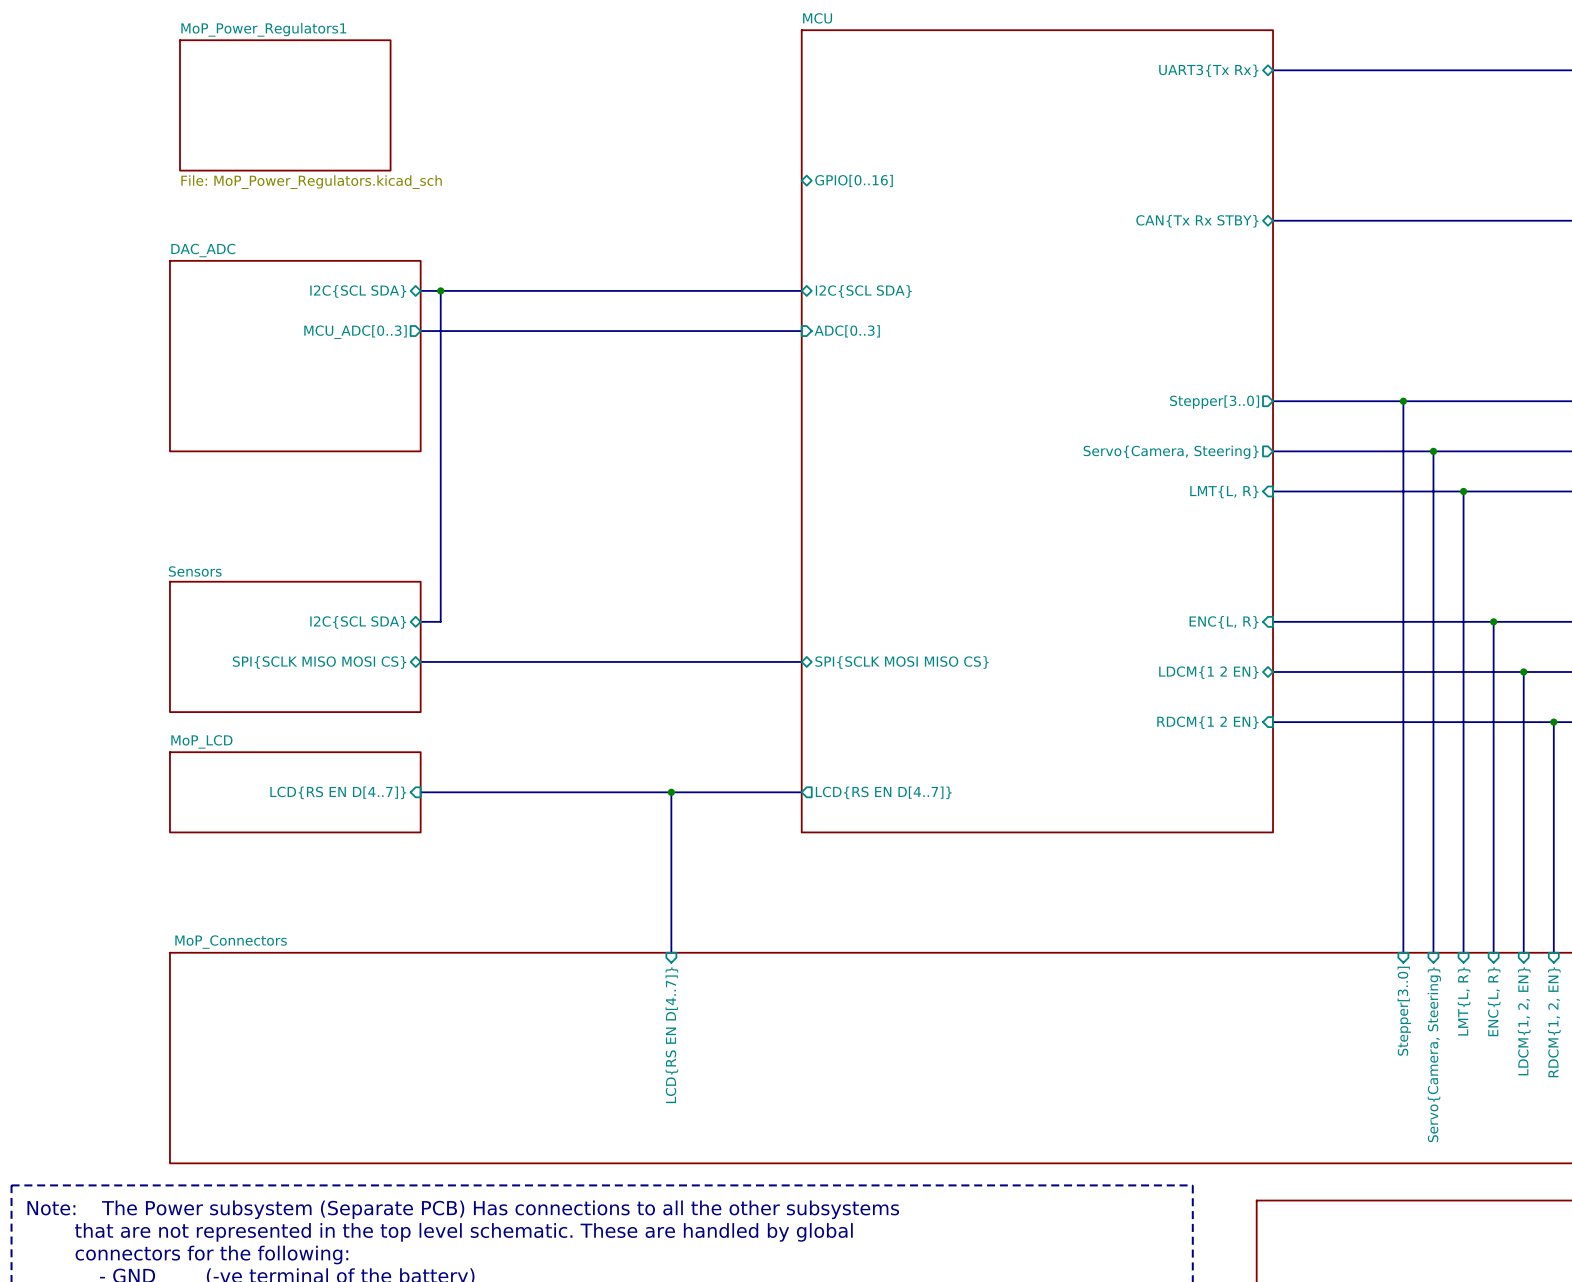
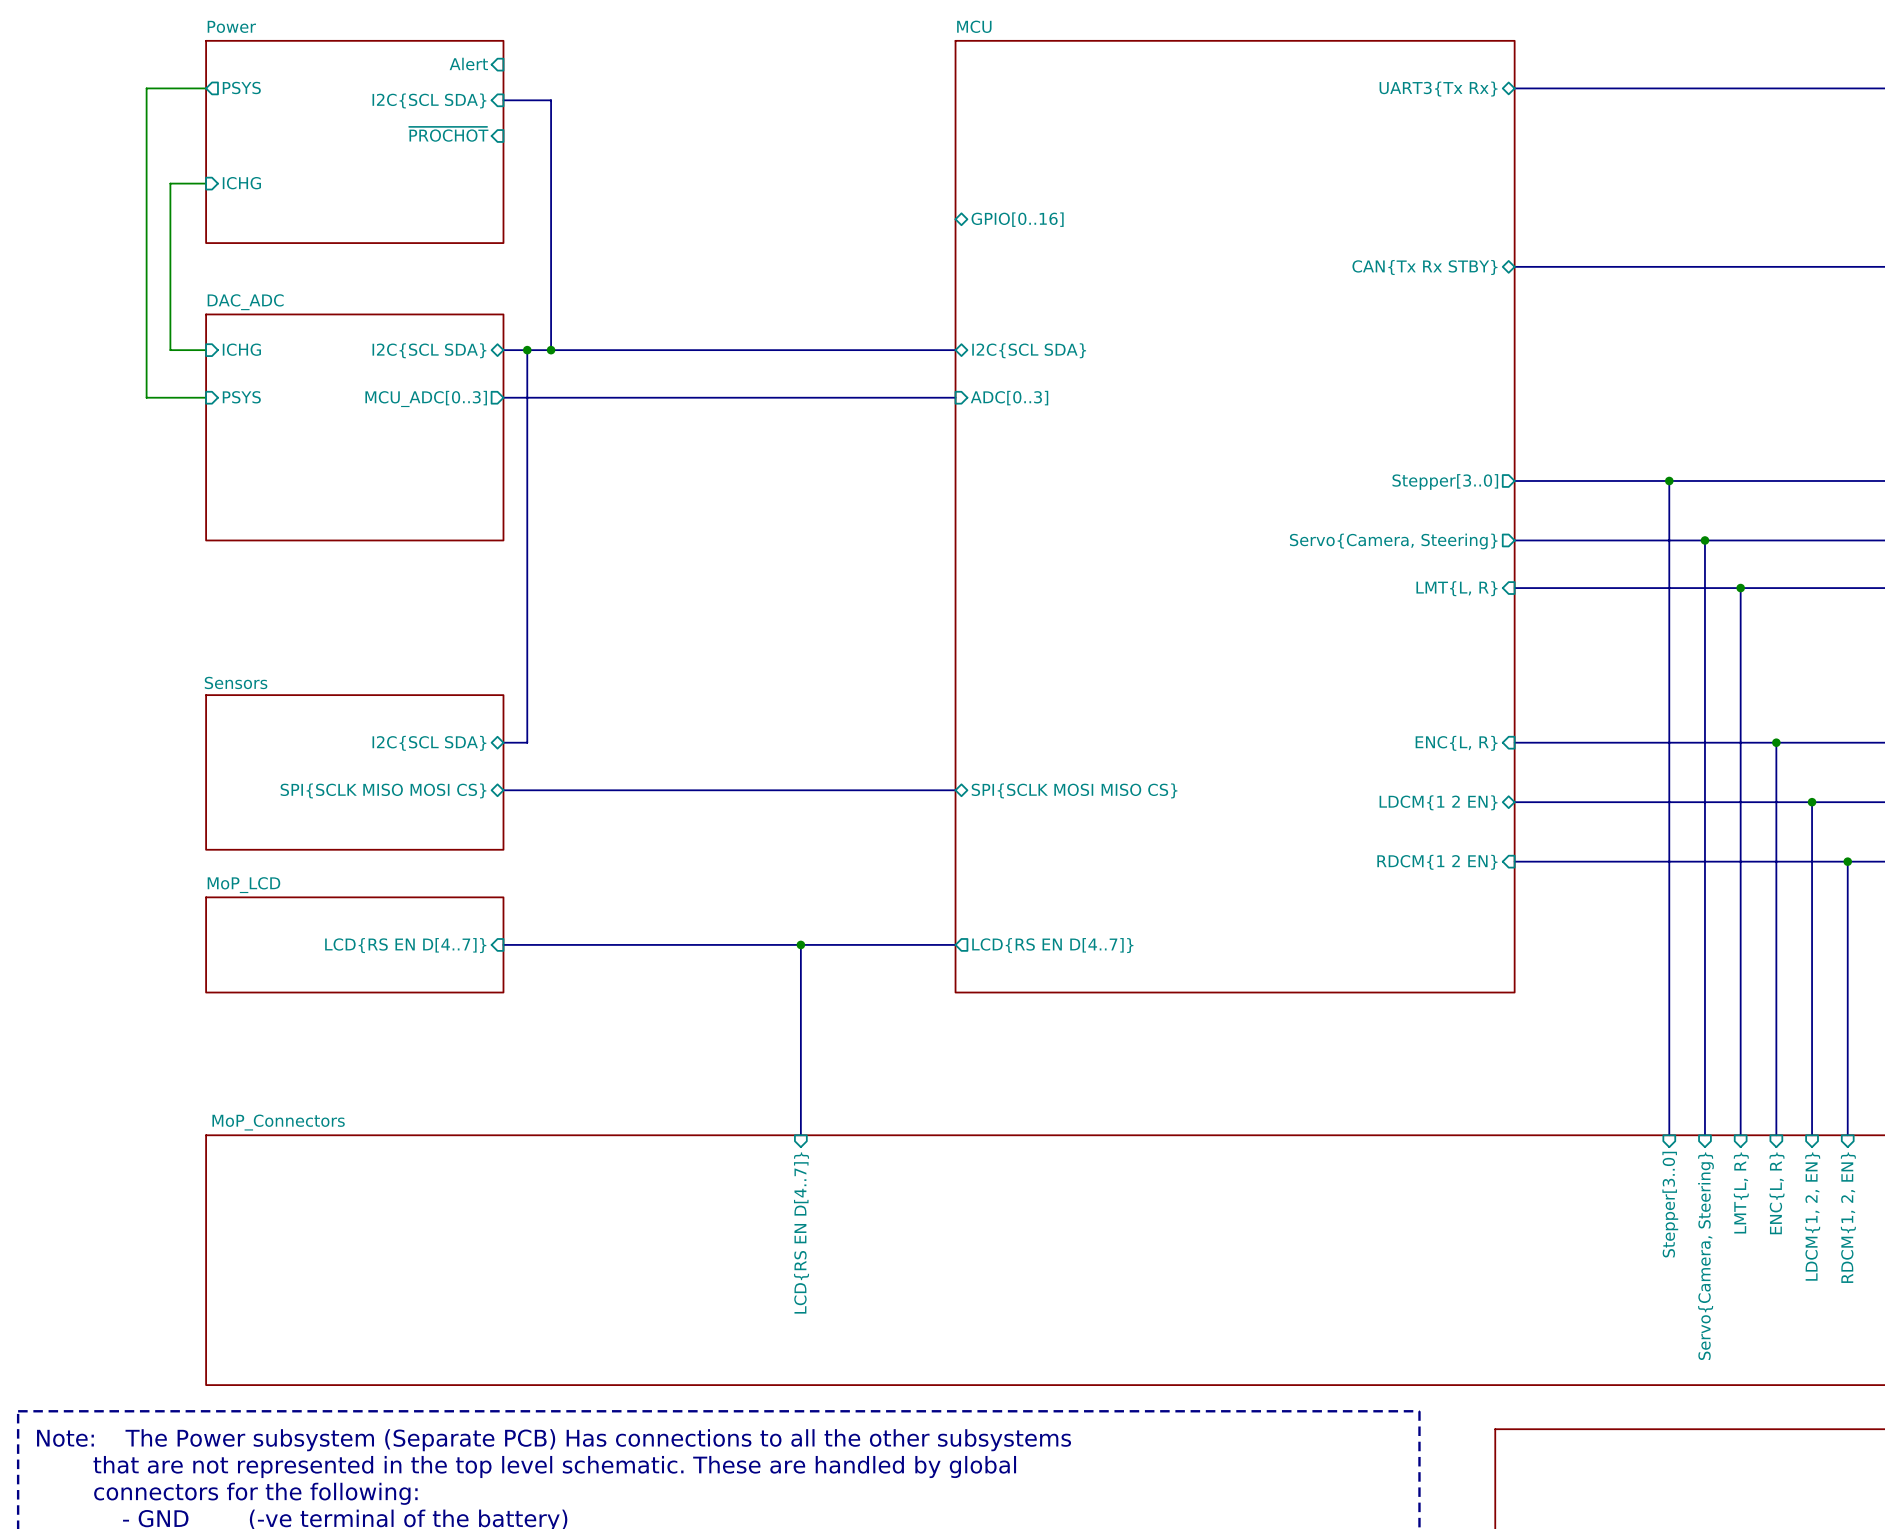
sheet pin: none -> Alert (468, 64)
sheet pin: none -> PSYS (241, 87)
wire: none -> (206, 88) (146, 88) (146, 397) (206, 397)
sheet pin: none -> I2C{SCL SDA} (429, 100)
bus: none -> (503, 100) (551, 100) (551, 350)
sheet MoP_Power_Regulators1: File: MoP_Power_Regulators.kicad_sch (285, 105) -> none
sheet pin: none -> ~{PROCHOT} (448, 134)
sheet Power: none -> (354, 141)
wire: none -> (206, 183) (170, 183) (170, 350) (206, 350)
sheet pin: none -> ICHG (241, 183)
sheet pin: none -> ICHG (241, 349)
junction: none -> (551, 350)
sheet pin: none -> PSYS (241, 397)

